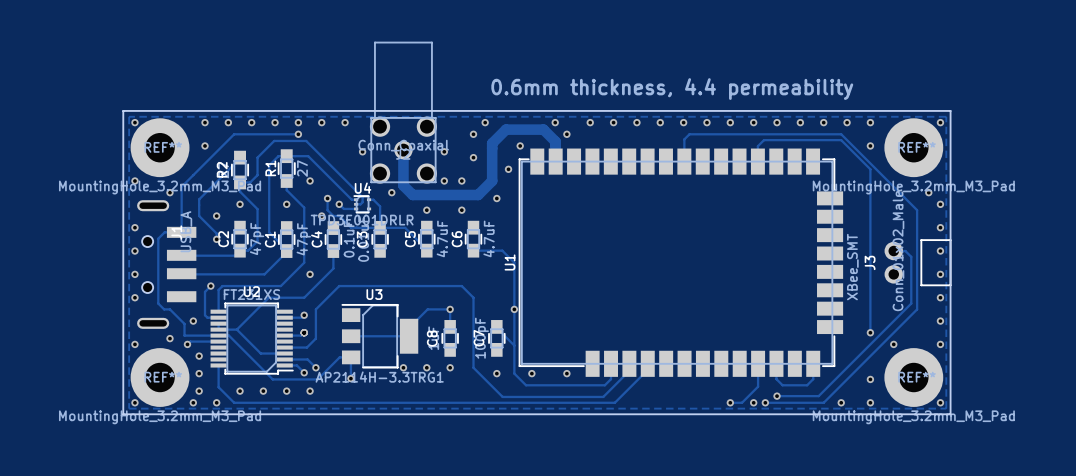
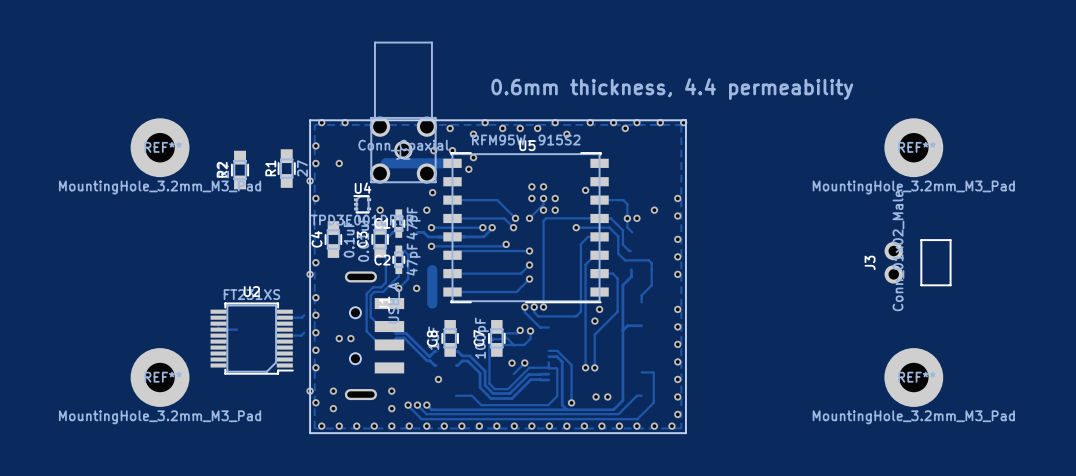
board edge: (123, 110) (950, 110) (950, 414) (123, 414) (123, 110) -> none
zone outline: (129, 116) (129, 408) (946, 408) (946, 116) (129, 116) -> none
board edge: none -> (310, 120) (310, 433) (685, 433) (685, 120) (310, 120)
via: (134, 122) -> none
via: (205, 122) -> none
via: (228, 122) -> none
via: (251, 122) -> none
via: (275, 122) -> none
via: (298, 122) -> none
via: (706, 122) -> none
via: (730, 122) -> none
via: (753, 122) -> none
via: (777, 122) -> none
via: (800, 122) -> none
via: (823, 122) -> none
via: (847, 122) -> none
via: (870, 122) -> none
via: (940, 122) -> none
zone outline: none -> (314, 124) (681, 124) (681, 428) (314, 428) (314, 124)
via: none -> (450, 128)
via: none -> (502, 128)
via: none -> (520, 128)
via: none -> (537, 128)
via: none -> (625, 128)
track: (298, 134) (234, 134) (181, 186) (181, 232) (164, 232) (158, 238) (158, 303) (164, 309) (169, 309) (184, 323) (184, 335) (228, 335) (272, 379) (317, 379) (339, 357) (351, 357) (350, 378) -> none
via: (298, 134) -> none
via: (205, 145) -> none
via: none -> (315, 145)
via: (520, 145) -> none
via: (870, 145) -> none
track: (403, 150) (403, 185) (412, 195) (478, 195) (492, 180) (492, 143) (506, 129) (543, 129) (555, 141) (555, 161) -> none
via: none -> (433, 150)
via: none -> (452, 150)
via: (362, 151) -> none
via: (444, 151) -> none
track: (240, 157) (199, 199) (199, 216) (216, 233) (216, 239) -> none
track: (684, 161) (684, 139) (689, 134) (841, 134) (917, 210) (917, 309) (823, 402) (765, 402) -> none
track: (757, 161) (757, 146) (764, 140) (841, 140) (870, 169) (870, 332) -> none
via: none -> (315, 163)
via: none -> (339, 163)
track: none -> (452, 163) (385, 163)
via: none -> (468, 169)
via: (508, 169) -> none
via: (134, 180) -> none
track: (286, 180) (286, 190) (304, 207) (304, 262) (280, 286) (222, 286) (218, 289) (218, 311) -> none
via: (444, 180) -> none
via: (461, 180) -> none
via: none -> (531, 186)
via: none -> (543, 186)
via: none -> (585, 190)
via: (169, 192) -> none
via: (391, 192) -> none
via: none -> (432, 192)
via: (928, 192) -> none
via: none -> (315, 198)
track: (327, 198) (327, 210) (333, 216) (339, 216) (351, 227) (405, 227) (426, 250) -> none
via: (327, 198) -> none
via: (496, 198) -> none
via: none -> (531, 198)
via: none -> (543, 198)
via: none -> (555, 198)
via: none -> (677, 198)
track: (356, 199) (351, 199) (308, 156) (278, 156) (269, 165) (269, 232) (286, 249) (286, 252) (264, 274) (169, 274) -> none
track: (369, 199) (373, 199) (380, 206) (380, 227) -> none
track: none -> (543, 199) (543, 204) (529, 218)
track: none -> (452, 200) (497, 200) (515, 218)
track: none -> (599, 200) (623, 200) (627, 204) (627, 227) (632, 232)
via: (240, 204) -> none
via: (286, 204) -> none
track: (339, 204) (343, 208) (356, 208) -> none
via: (339, 204) -> none
track: (356, 204) (362, 202) (362, 197) (306, 140) (274, 140) (257, 157) (257, 175) (250, 182) (240, 182) (240, 191) (257, 209) (257, 241) (248, 250) (240, 250) (234, 255) (169, 255) -> none
via: (940, 204) -> none
via: none -> (380, 210)
via: (461, 210) -> none
via: none -> (543, 210)
via: none -> (555, 210)
via: none -> (654, 210)
via: (216, 216) -> none
via: (321, 216) -> none
via: none -> (677, 216)
track: none -> (452, 218) (504, 218) (513, 227)
via: none -> (515, 218)
via: none -> (529, 218)
via: none -> (627, 218)
via: none -> (636, 218)
C2 footprint: [231, 220, 249, 258] -> [392, 245, 405, 275]
C1 footprint: [278, 221, 296, 258] -> [392, 209, 405, 238]
via: (134, 227) -> none
track: none -> (431, 227) (482, 227)
via: none -> (431, 227)
via: none -> (482, 227)
track: none -> (492, 227) (483, 236) (428, 237) (423, 232) (417, 232)
via: none -> (492, 227)
via: none -> (513, 227)
U5: none -> RFM95W-915S2 (526, 227)
track: none -> (576, 227) (609, 227) (618, 236) (618, 253) (625, 260) (648, 260) (651, 263) (651, 285) (641, 295) (641, 302)
via: none -> (576, 227)
via: (940, 227) -> none
track: none -> (398, 232) (392, 232) (385, 239) (385, 282) (381, 287) (373, 287) (366, 293) (366, 331) (380, 344) (389, 344) (396, 338) (404, 338) (427, 360) (436, 365)
track: none -> (599, 236) (588, 236) (580, 244) (580, 311) (576, 316) (538, 316) (534, 312) (534, 307)
via: (216, 239) -> none
C5: 4.7uF (426, 239) -> none
C6: 4.7uF (473, 239) -> none
via: none -> (677, 239)
track: none -> (506, 244) (504, 246) (431, 246)
via: none -> (506, 244)
via: none -> (431, 246)
track: (473, 250) (502, 250) (514, 262) (514, 373) (526, 385) (604, 385) (611, 379) (611, 363) -> none
via: (134, 251) -> none
track: (333, 251) (333, 268) (304, 297) (268, 297) (236, 329) (260, 353) (284, 353) -> none
track: none -> (398, 251) (404, 251) (408, 254) (408, 279) (398, 288)
track: none -> (529, 251) (456, 251) (452, 255)
via: none -> (529, 251)
track: none -> (630, 251) (622, 244) (622, 230) (611, 218) (546, 218) (543, 221) (543, 307)
track: (893, 251) (905, 251) (911, 256) (911, 303) (818, 396) (777, 396) -> none
via: (940, 251) -> none
track: none -> (599, 255) (594, 255) (585, 264) (585, 367)
via: none -> (677, 256)
via: none -> (315, 262)
U1: XBee_SMT (681, 262) -> none
part position: (166, 264) -> (374, 335)
track: none -> (529, 265) (520, 273) (452, 273)
via: none -> (529, 265)
track: none -> (398, 268) (398, 276) (383, 291) (374, 291) (370, 295) (370, 317) (380, 326) (389, 326)
track: none -> (432, 269) (432, 303)
track: none -> (631, 269) (631, 276) (622, 285) (622, 400) (613, 409) (431, 409) (426, 405)
track: none -> (599, 273) (612, 273) (617, 278) (617, 311) (594, 334) (594, 367)
via: (134, 274) -> none
via: none -> (677, 274)
via: (940, 274) -> none
track: none -> (529, 279) (516, 292) (452, 292)
via: none -> (529, 279)
track: (210, 286) (205, 291) (205, 315) (207, 317) (218, 317) -> none
via: (210, 286) -> none
via: none -> (398, 288)
via: none -> (416, 288)
via: (134, 297) -> none
via: none -> (315, 297)
via: (940, 297) -> none
track: none -> (524, 307) (524, 312) (540, 327) (548, 327)
via: none -> (524, 307)
via: none -> (534, 307)
via: none -> (543, 307)
via: (450, 309) -> none
via: (514, 309) -> none
via: none -> (599, 309)
via: none -> (677, 309)
via: (304, 315) -> none
via: none -> (315, 315)
via: (193, 321) -> none
via: none -> (594, 321)
via: (940, 321) -> none
track: none -> (641, 325) (627, 325) (622, 330)
track: none -> (389, 326) (396, 333) (406, 333) (428, 356) (436, 351)
track: (450, 326) (450, 309) (427, 309) (409, 327) (409, 336) (351, 336) -> none
via: none -> (677, 326)
track: none -> (520, 330) (517, 333) (500, 333)
via: none -> (520, 330)
track: none -> (530, 331) (530, 338) (524, 345) (500, 345)
via: none -> (530, 331)
via: (304, 332) -> none
via: none -> (315, 332)
via: (870, 332) -> none
U3: AP2114H-3.3TRG1 (380, 336) -> none
via: (169, 338) -> none
via: none -> (339, 338)
via: none -> (350, 338)
track: none -> (500, 339) (493, 339) (489, 342) (489, 383) (494, 389) (508, 389) (529, 367) (548, 367)
track: (218, 341) (190, 341) (187, 344) -> none
via: (134, 344) -> none
via: (187, 344) -> none
via: none -> (677, 344)
via: (893, 344) -> none
via: (940, 344) -> none
track: (284, 347) (306, 347) (315, 338) (315, 309) (339, 286) (461, 286) (473, 297) (473, 367) (502, 396) (603, 396) (629, 370) (629, 363) -> none
via: none -> (315, 350)
track: none -> (548, 350) (557, 350) (571, 365) (571, 402)
track: none -> (456, 351) (462, 355) (469, 355) (485, 371) (485, 385) (493, 393) (509, 393) (528, 374) (548, 374)
via: (199, 356) -> none
track: none -> (548, 356) (557, 356) (562, 361) (562, 405) (566, 409)
track: (284, 359) (307, 359) (315, 367) -> none
via: none -> (677, 361)
track: none -> (548, 362) (548, 368) (557, 369) (557, 396) (548, 405) (481, 405) (471, 395) (455, 395)
via: none -> (512, 363)
track: none -> (524, 363) (513, 374)
via: none -> (524, 363)
track: (647, 363) (647, 369) (614, 402) (234, 402) (218, 387) (218, 365) -> none
track: (758, 363) (758, 386) (742, 402) (730, 402) -> none
track: (776, 363) (776, 379) (782, 385) (807, 385) (813, 379) (813, 363) -> none
track: (284, 365) (296, 365) (304, 372) -> none
track: none -> (456, 365) (462, 360) (467, 360) (480, 373) (480, 387) (491, 398) (512, 398) (530, 379) (548, 380)
via: (403, 367) -> none
via: (426, 367) -> none
via: (450, 367) -> none
via: none -> (585, 367)
via: none -> (594, 367)
via: (304, 372) -> none
track: none -> (641, 372) (653, 373) (653, 402) (637, 419) (421, 419) (408, 405)
via: (199, 373) -> none
via: (496, 373) -> none
via: (531, 373) -> none
via: (566, 373) -> none
via: (350, 378) -> none
via: none -> (438, 379)
via: none -> (677, 379)
via: (870, 379) -> none
via: (199, 391) -> none
via: (240, 391) -> none
via: (263, 391) -> none
via: (286, 391) -> none
via: none -> (333, 391)
via: none -> (391, 391)
track: none -> (641, 395) (637, 395) (618, 414) (426, 414) (417, 405)
via: none -> (596, 396)
via: none -> (607, 396)
via: none -> (677, 396)
via: (777, 396) -> none
via: (134, 402) -> none
via: (193, 402) -> none
via: (216, 402) -> none
via: none -> (315, 402)
via: none -> (571, 402)
via: (730, 402) -> none
via: (753, 402) -> none
via: (765, 402) -> none
via: (841, 402) -> none
via: (870, 402) -> none
via: (940, 402) -> none
via: none -> (408, 405)
via: none -> (417, 405)
via: none -> (426, 405)
via: none -> (333, 408)
via: none -> (391, 408)
via: none -> (677, 414)
via: none -> (321, 426)
via: none -> (339, 426)
via: none -> (356, 426)
via: none -> (374, 426)
via: none -> (391, 426)
via: none -> (409, 426)
via: none -> (426, 426)
via: none -> (444, 426)
via: none -> (461, 426)
via: none -> (479, 426)
via: none -> (496, 426)
via: none -> (514, 426)
via: none -> (531, 426)
via: none -> (549, 426)
via: none -> (566, 426)
via: none -> (584, 426)
via: none -> (601, 426)
via: none -> (619, 426)
via: none -> (636, 426)
via: none -> (654, 426)
via: none -> (671, 426)

